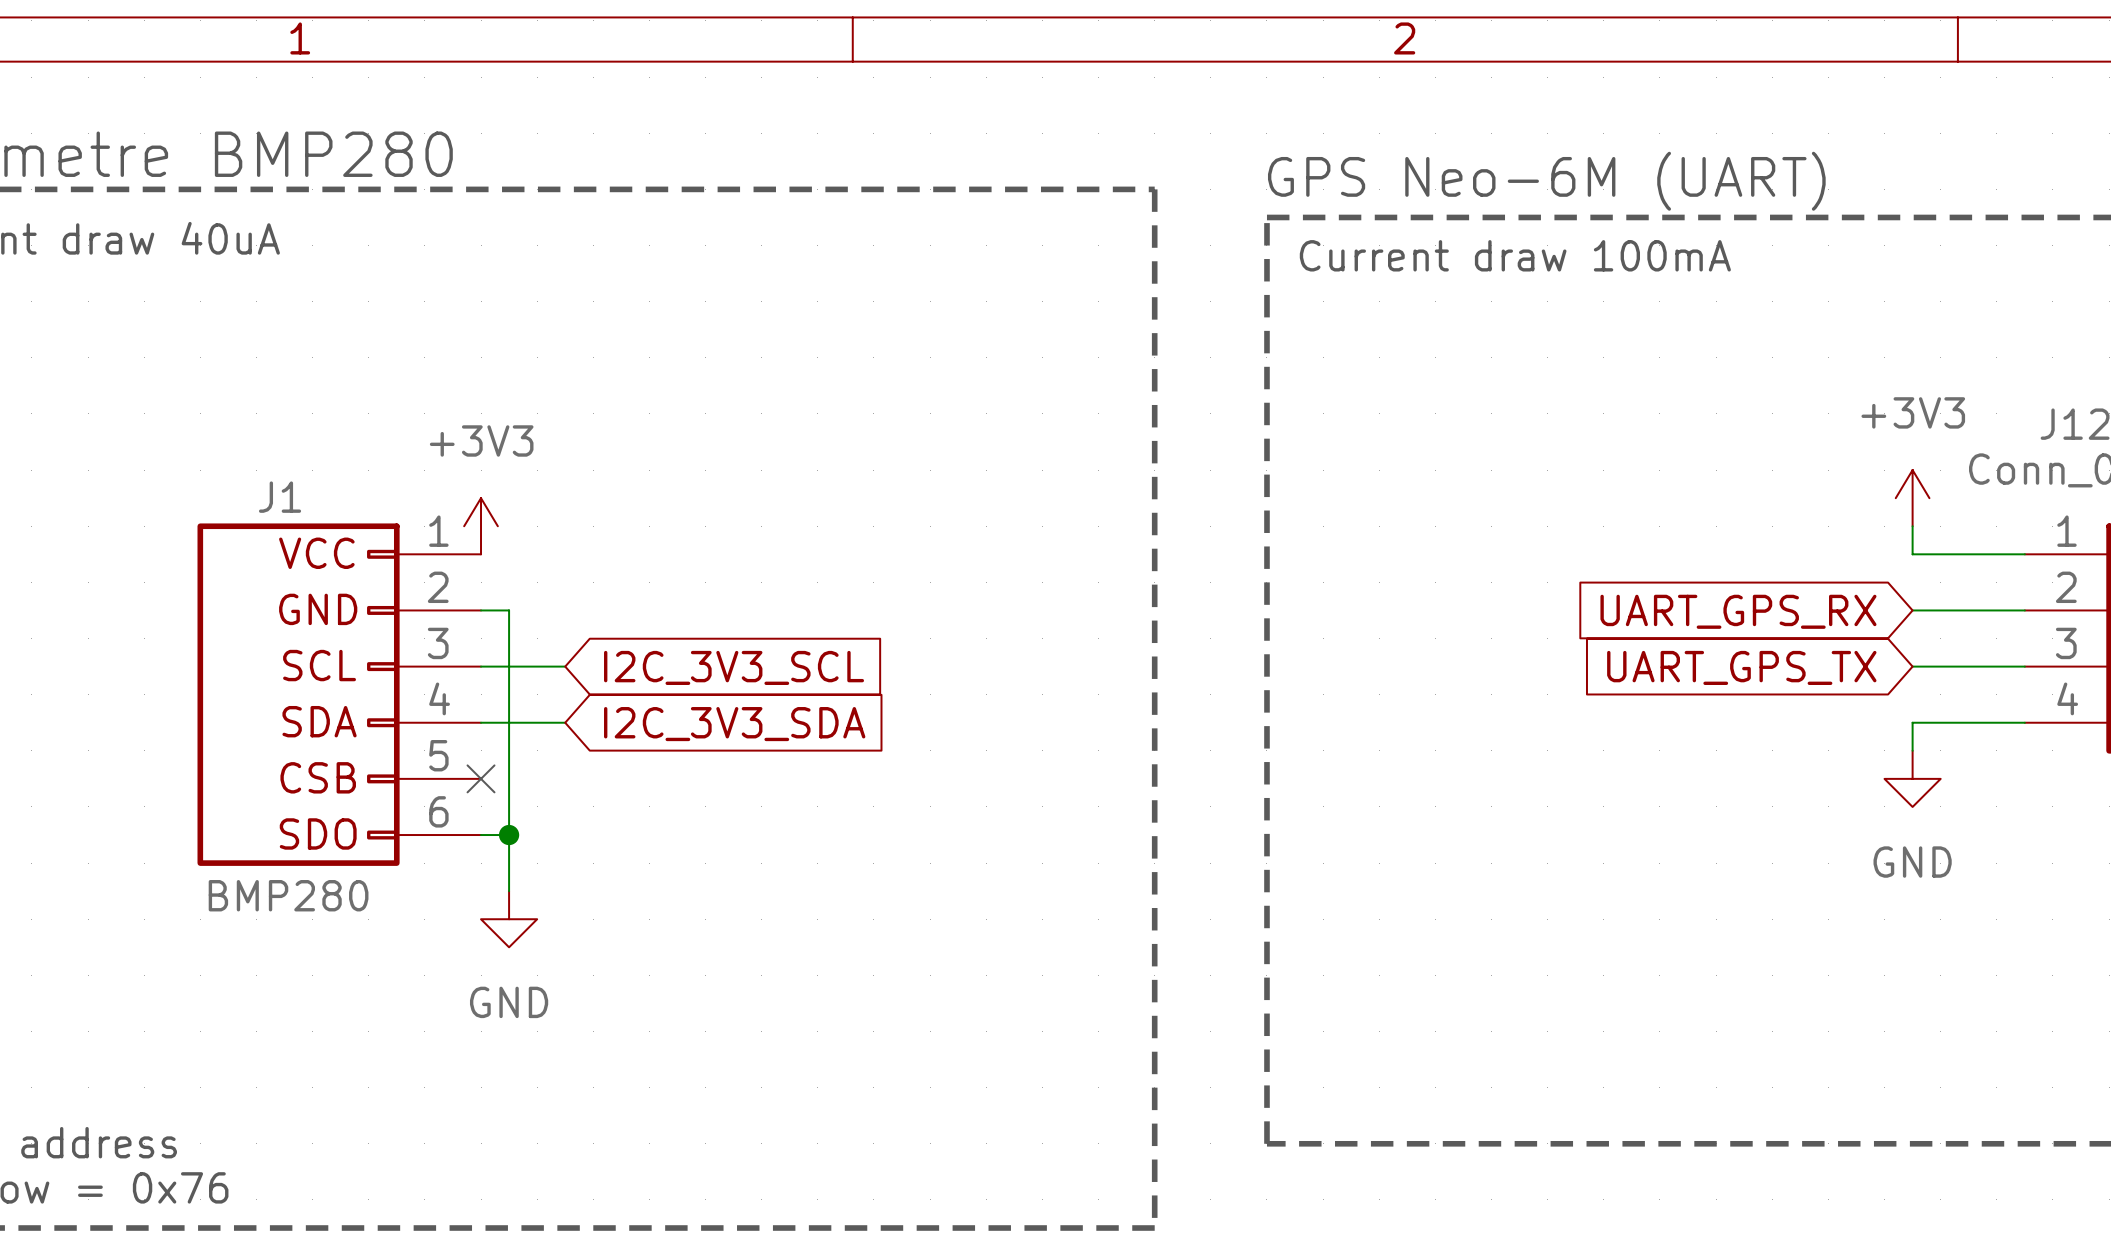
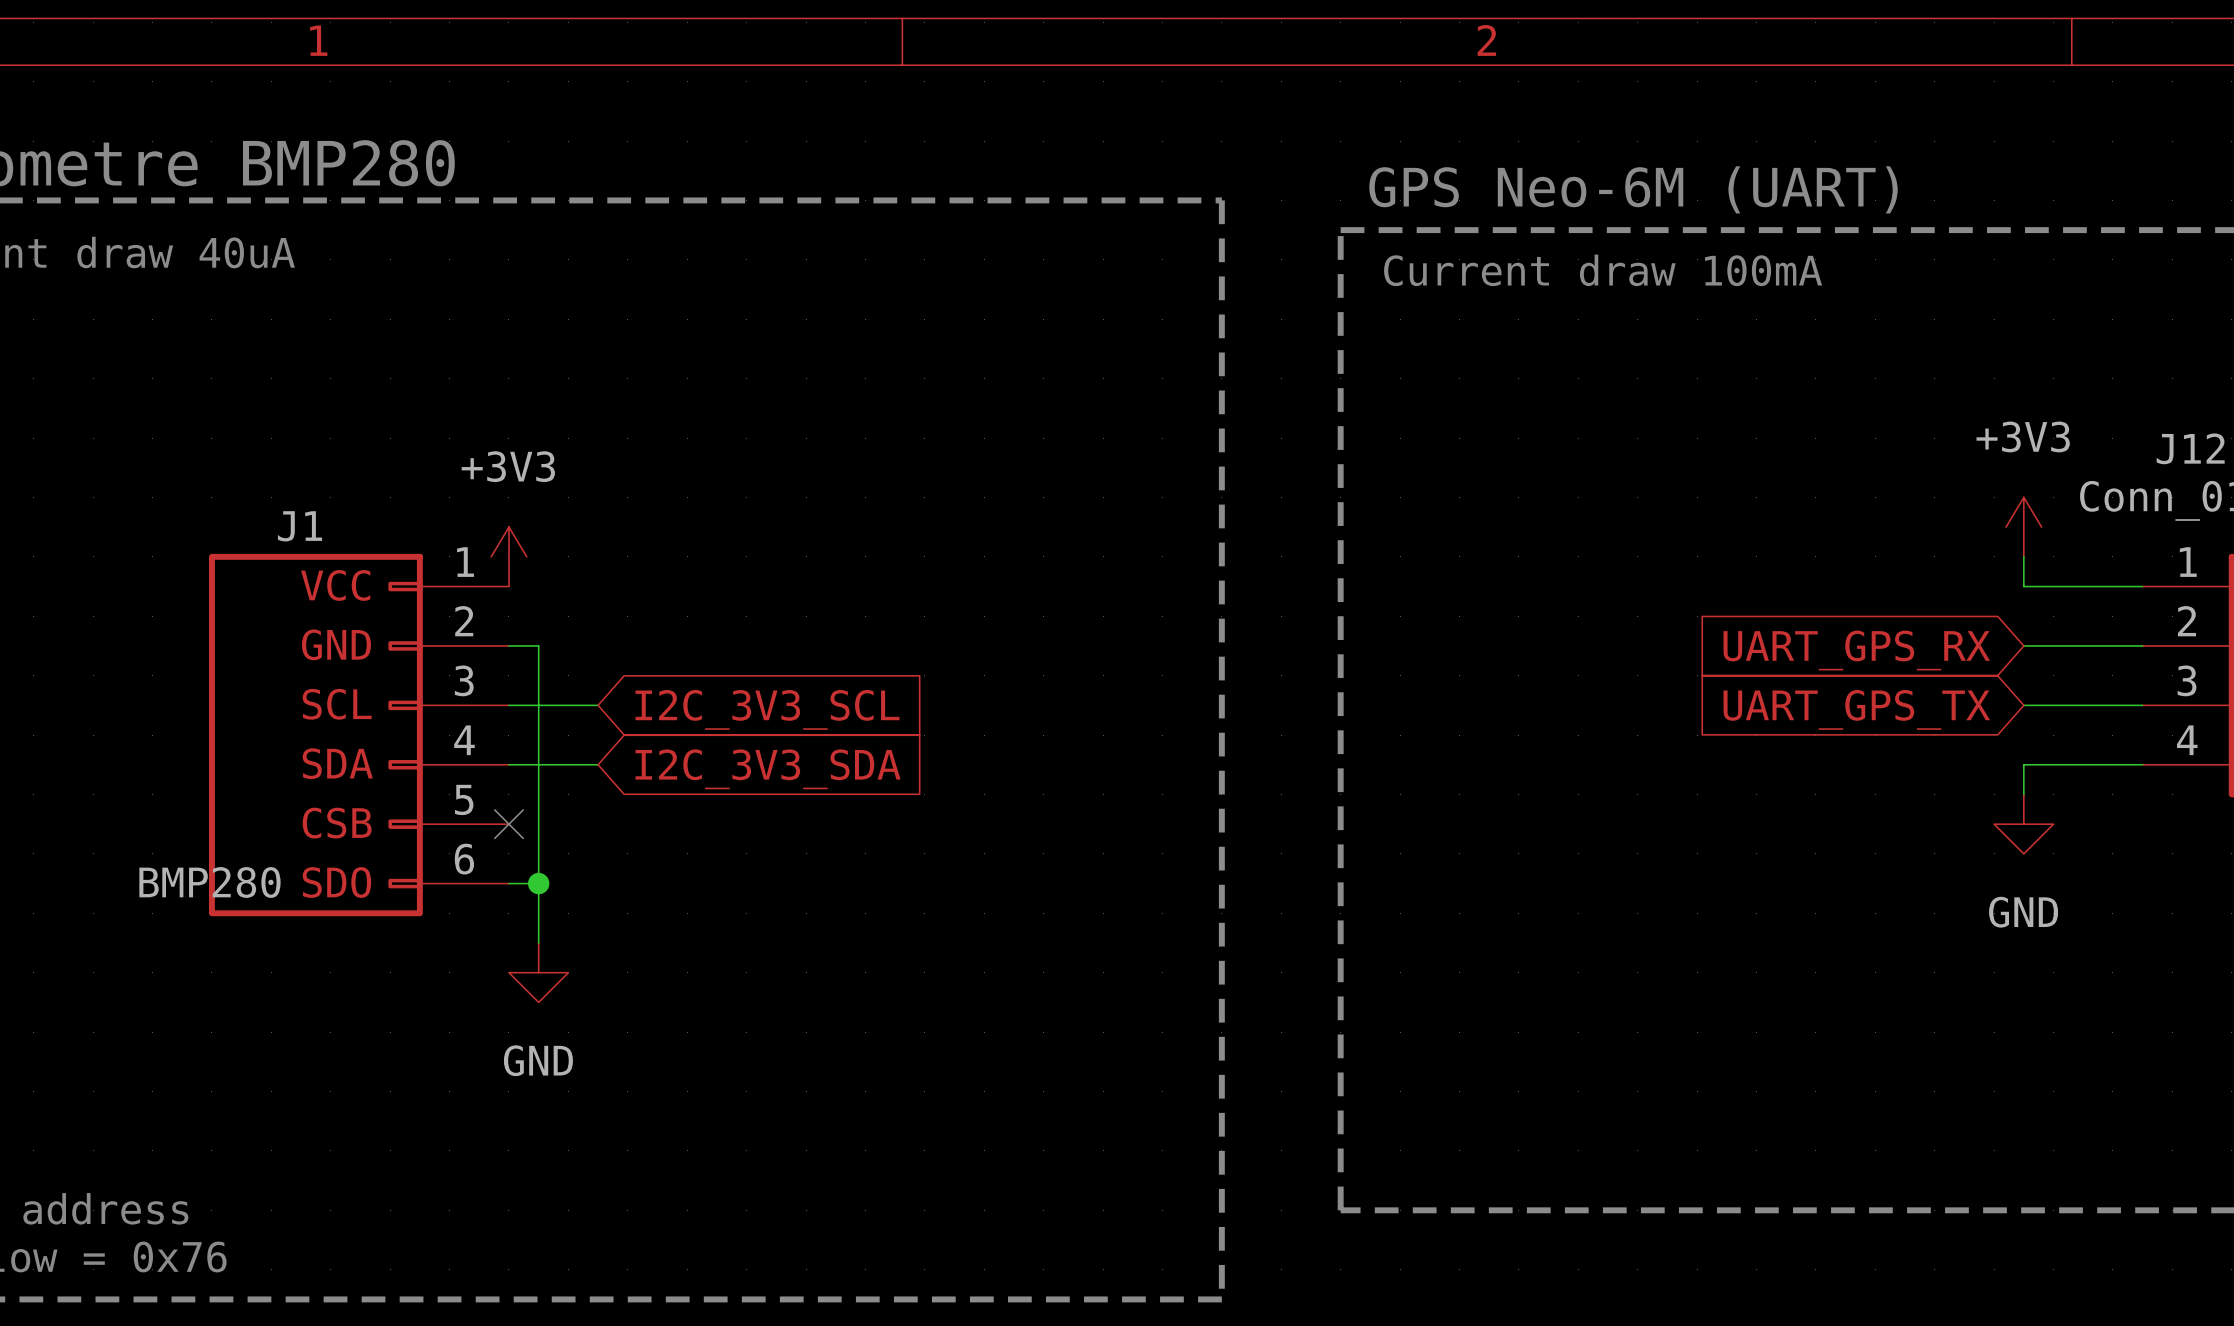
J1 value position: BMP280 (288, 895) -> BMP280 (209, 882)

